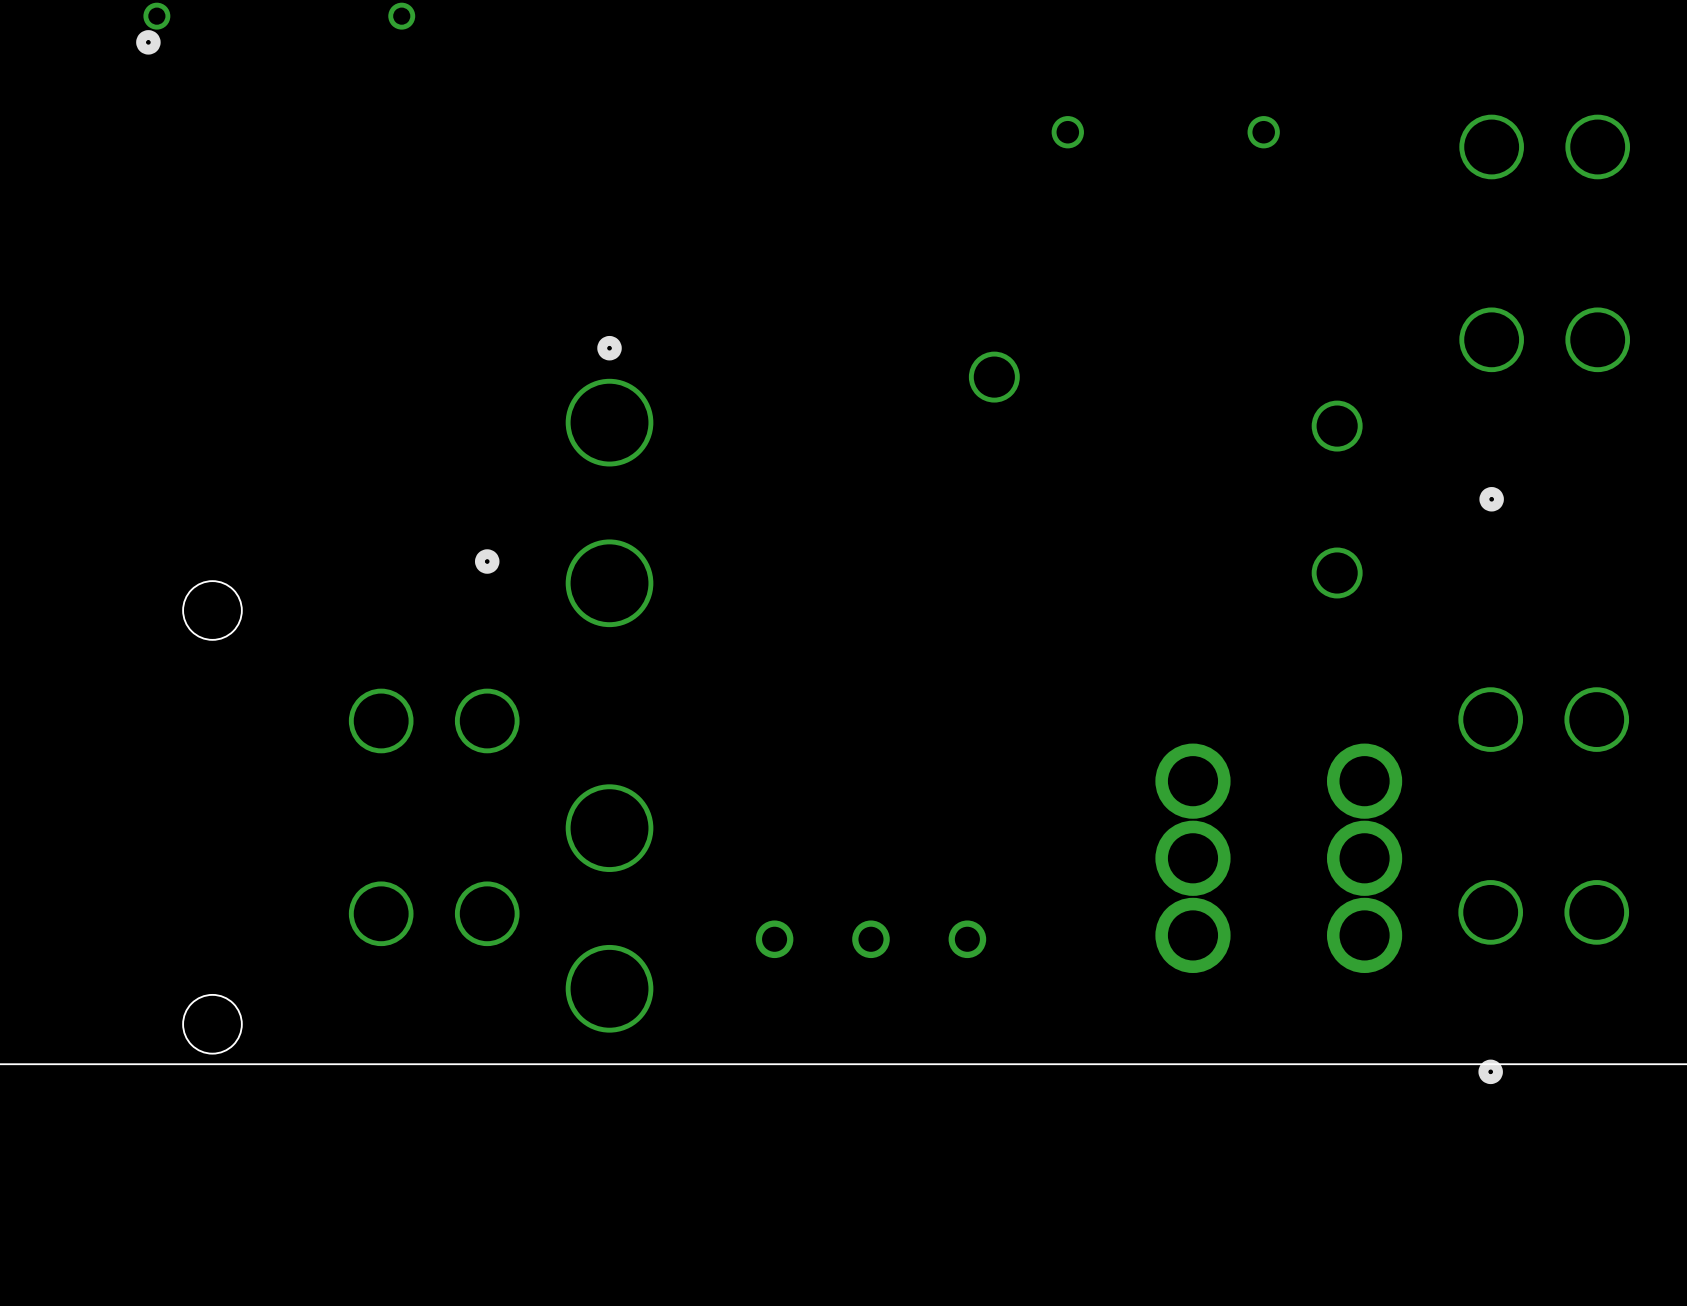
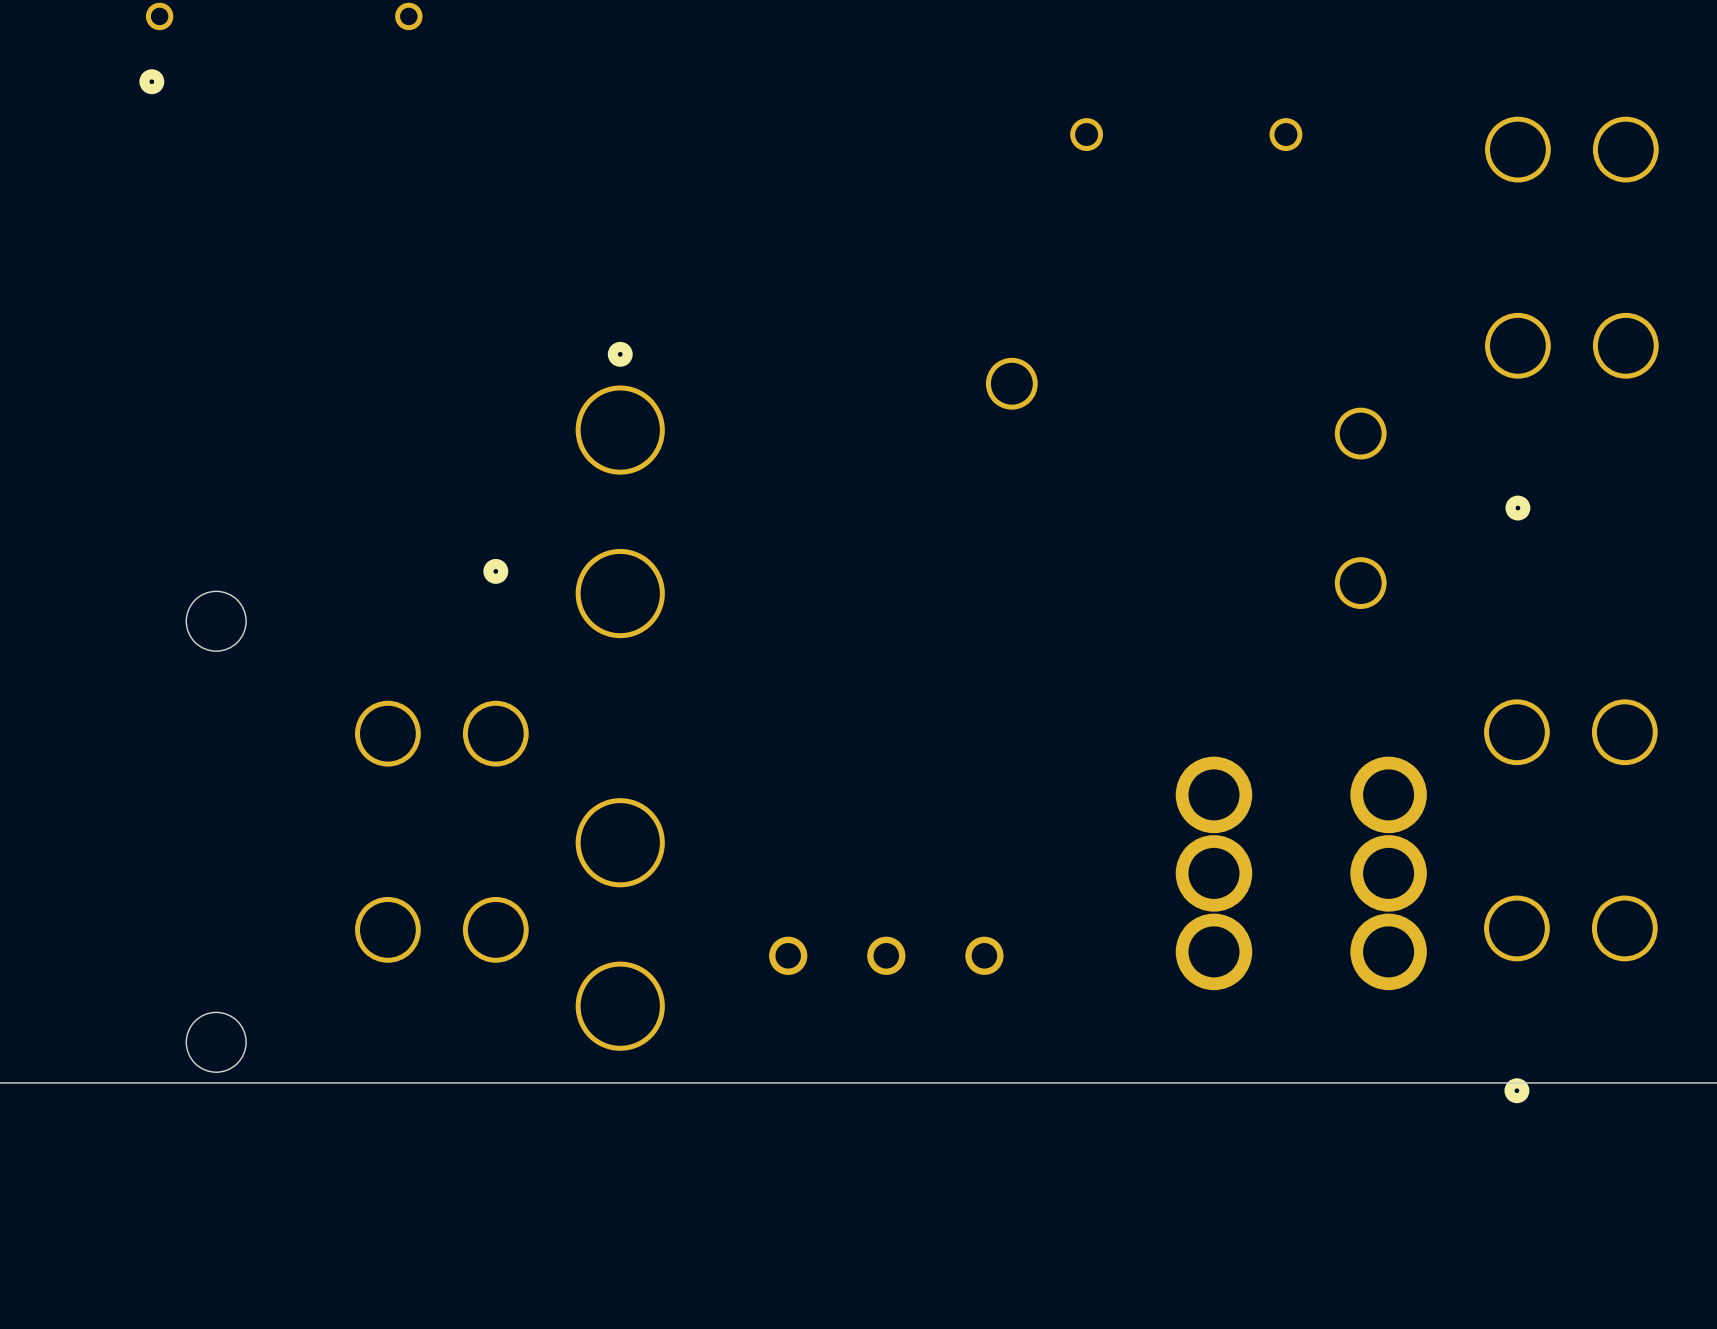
part position: (148, 42) -> (151, 81)

